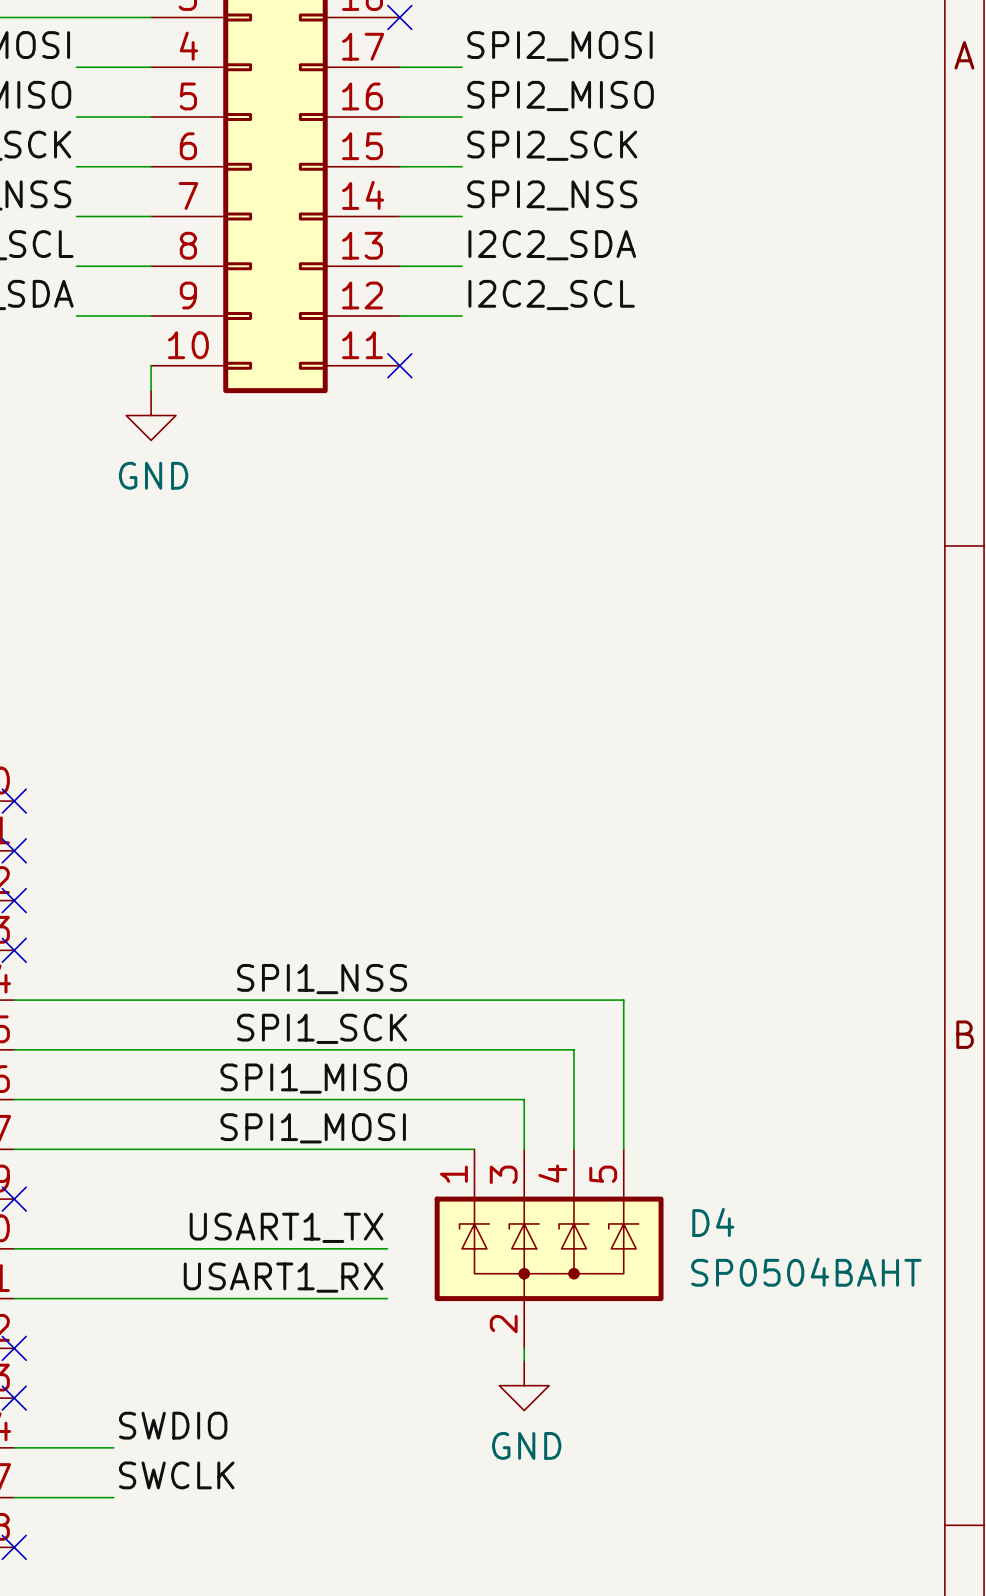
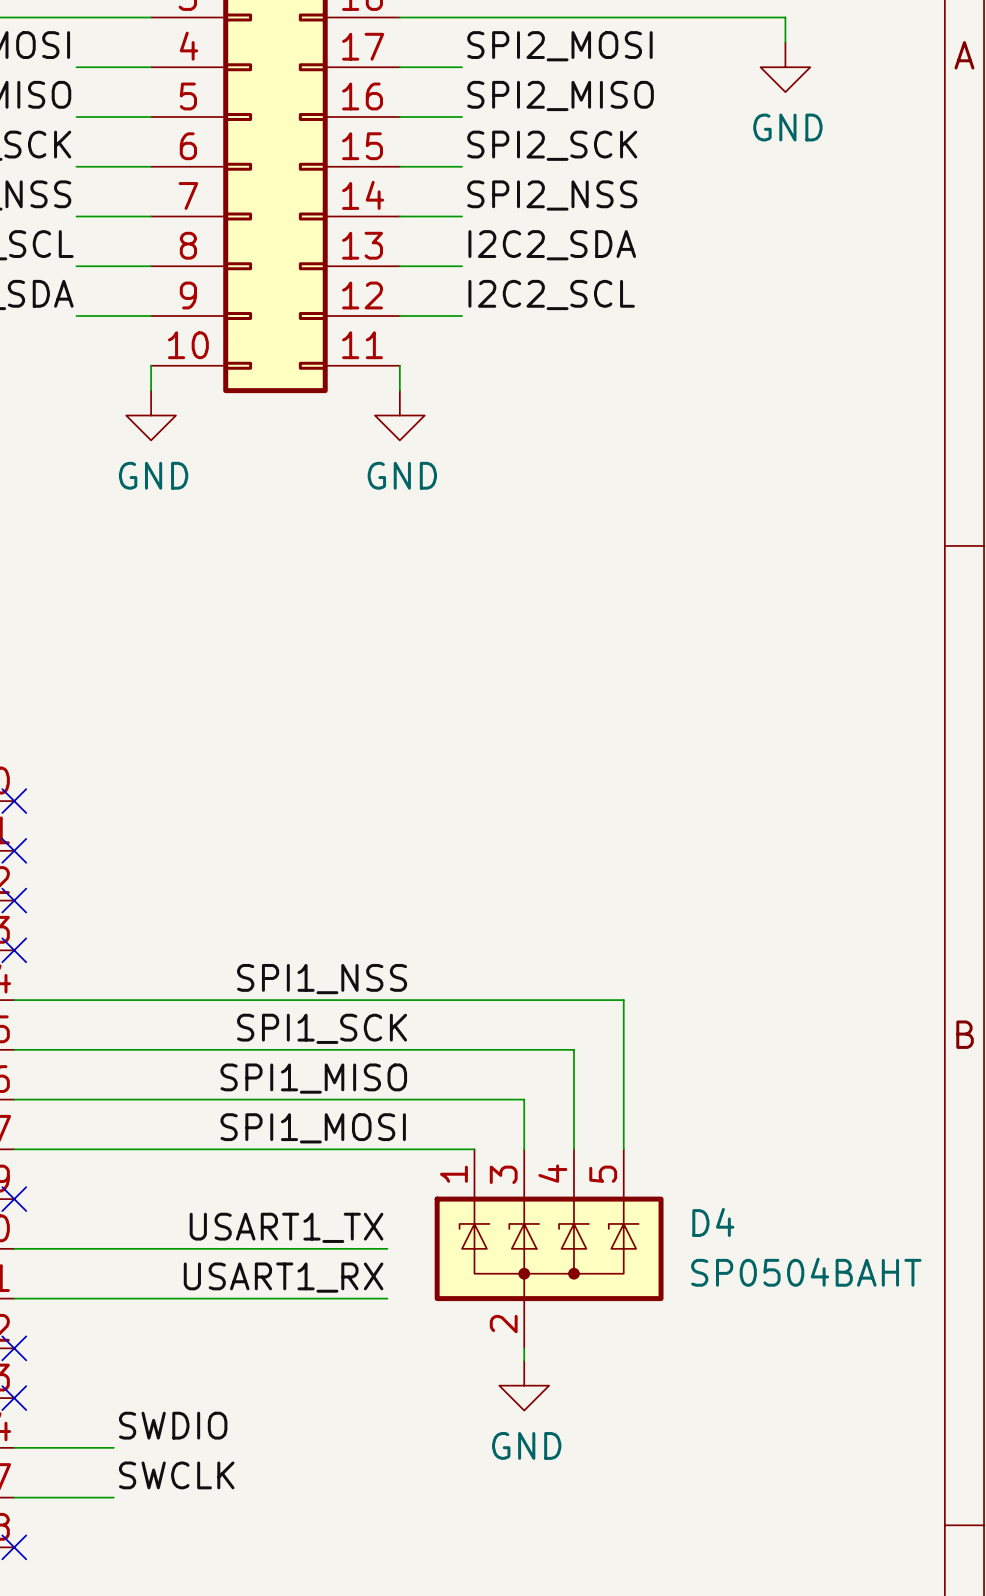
wire: none -> (399, 17) (785, 17) (785, 42)
no-connect mark: (399, 17) -> none
power symbol: none -> GND (785, 67)
wire: none -> (399, 365) (399, 390)
no-connect mark: (399, 365) -> none
power symbol: none -> GND (399, 415)

